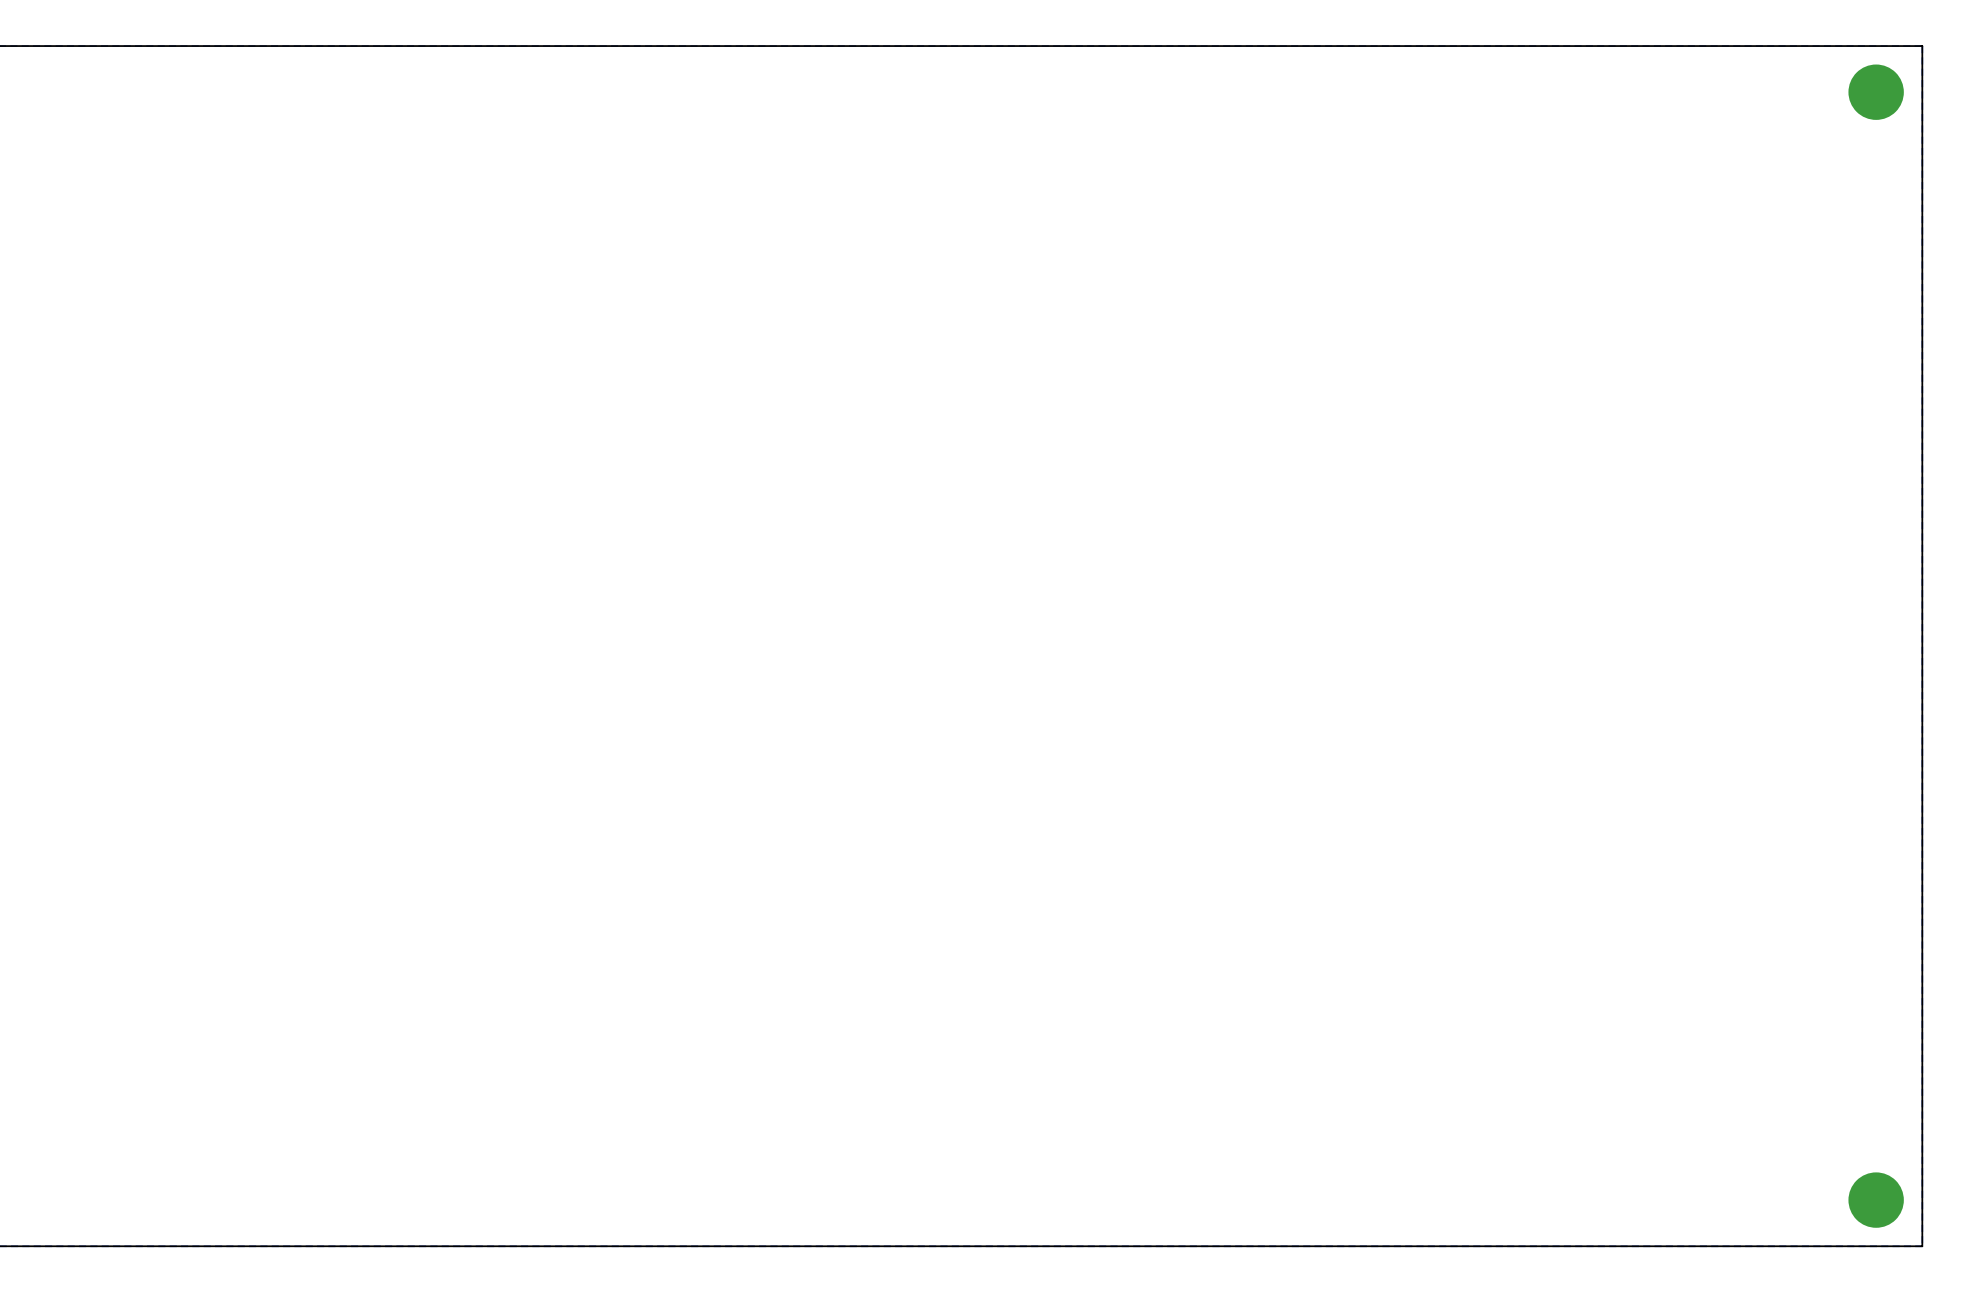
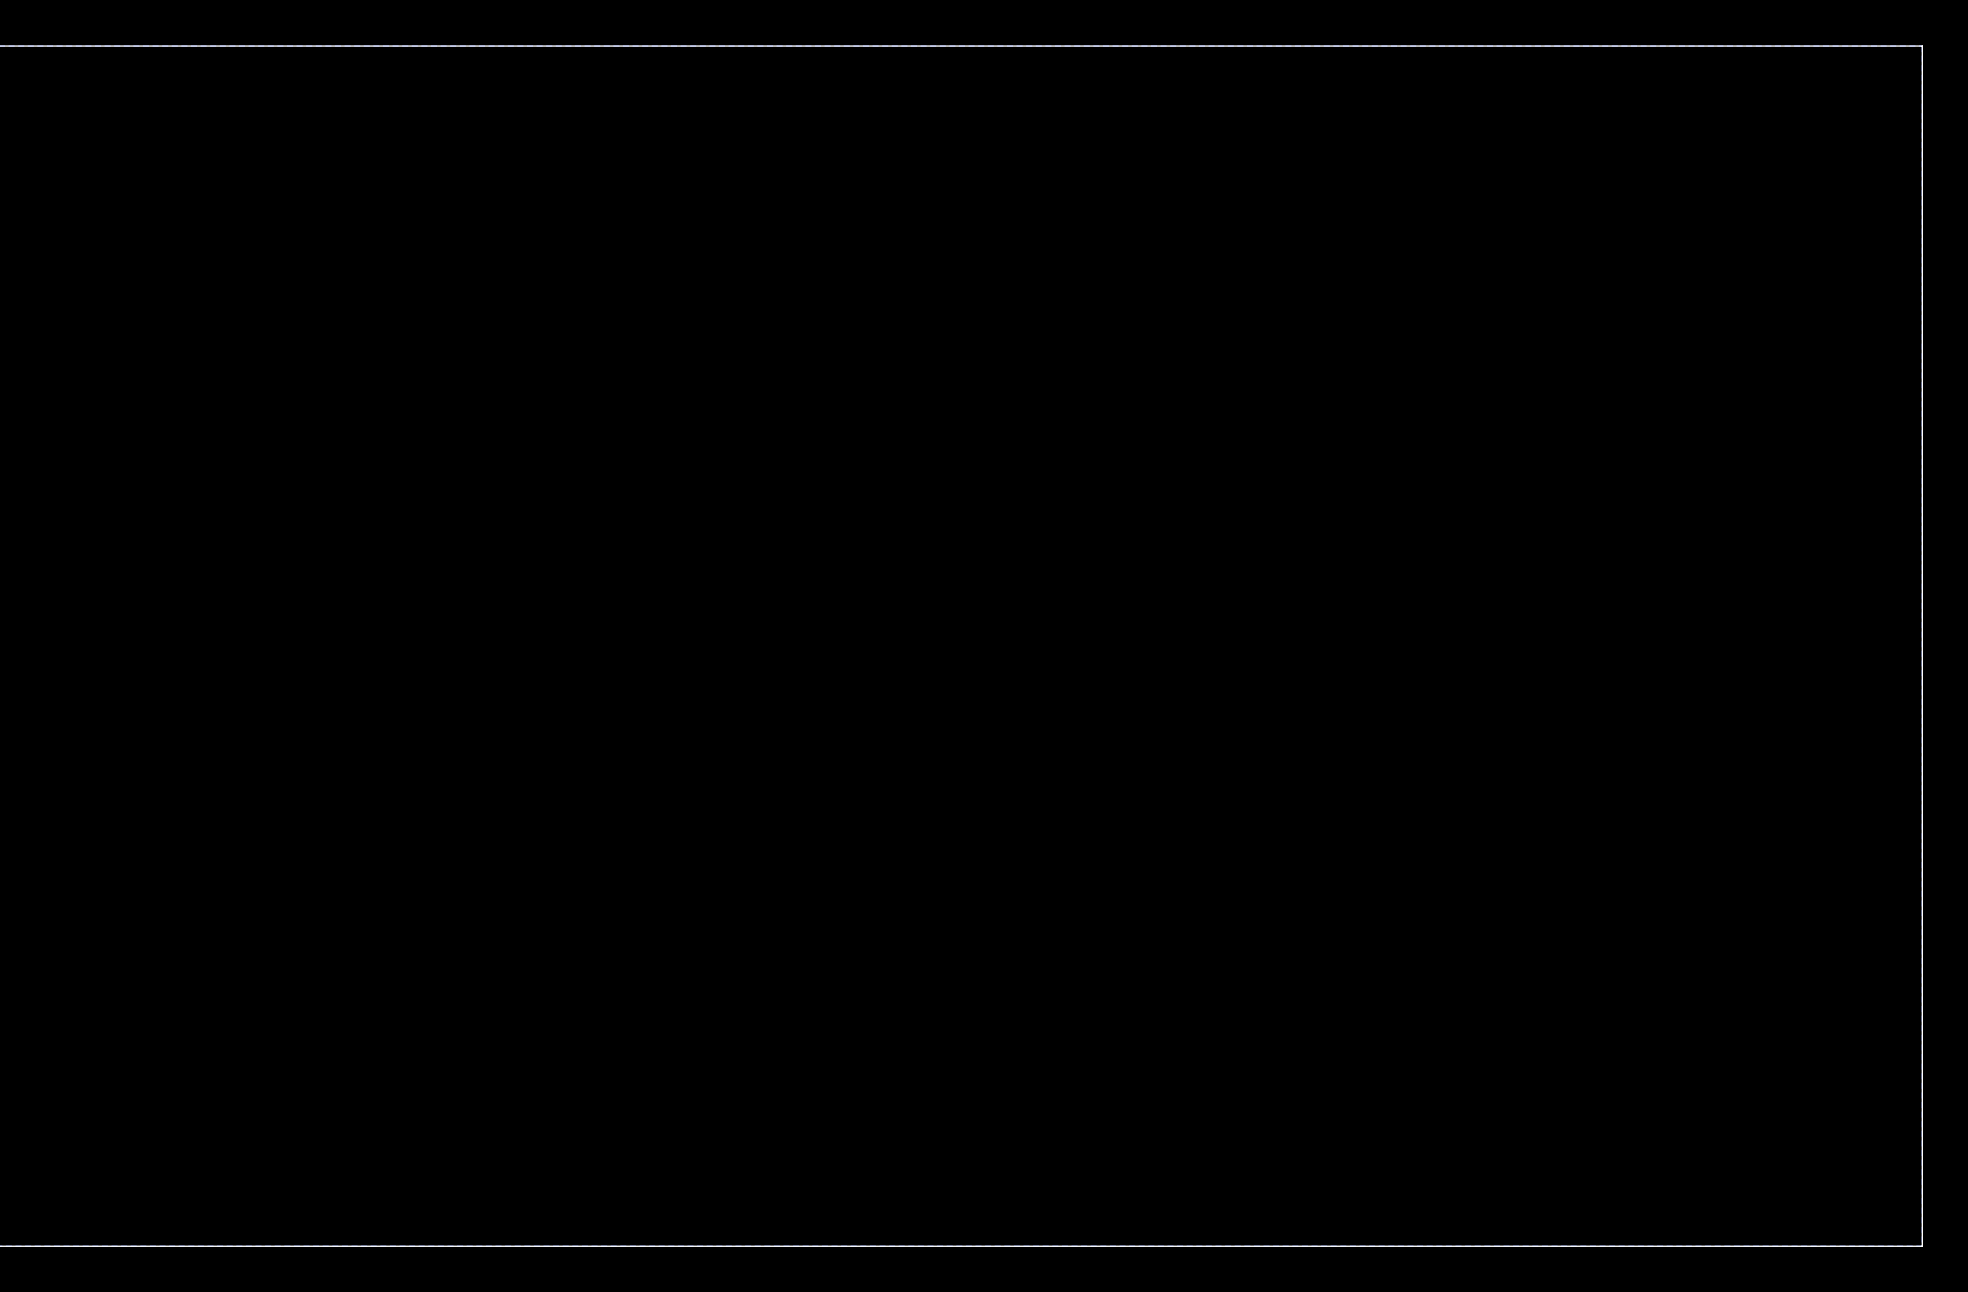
part: (1876, 92) -> none
part: (1876, 1200) -> none

